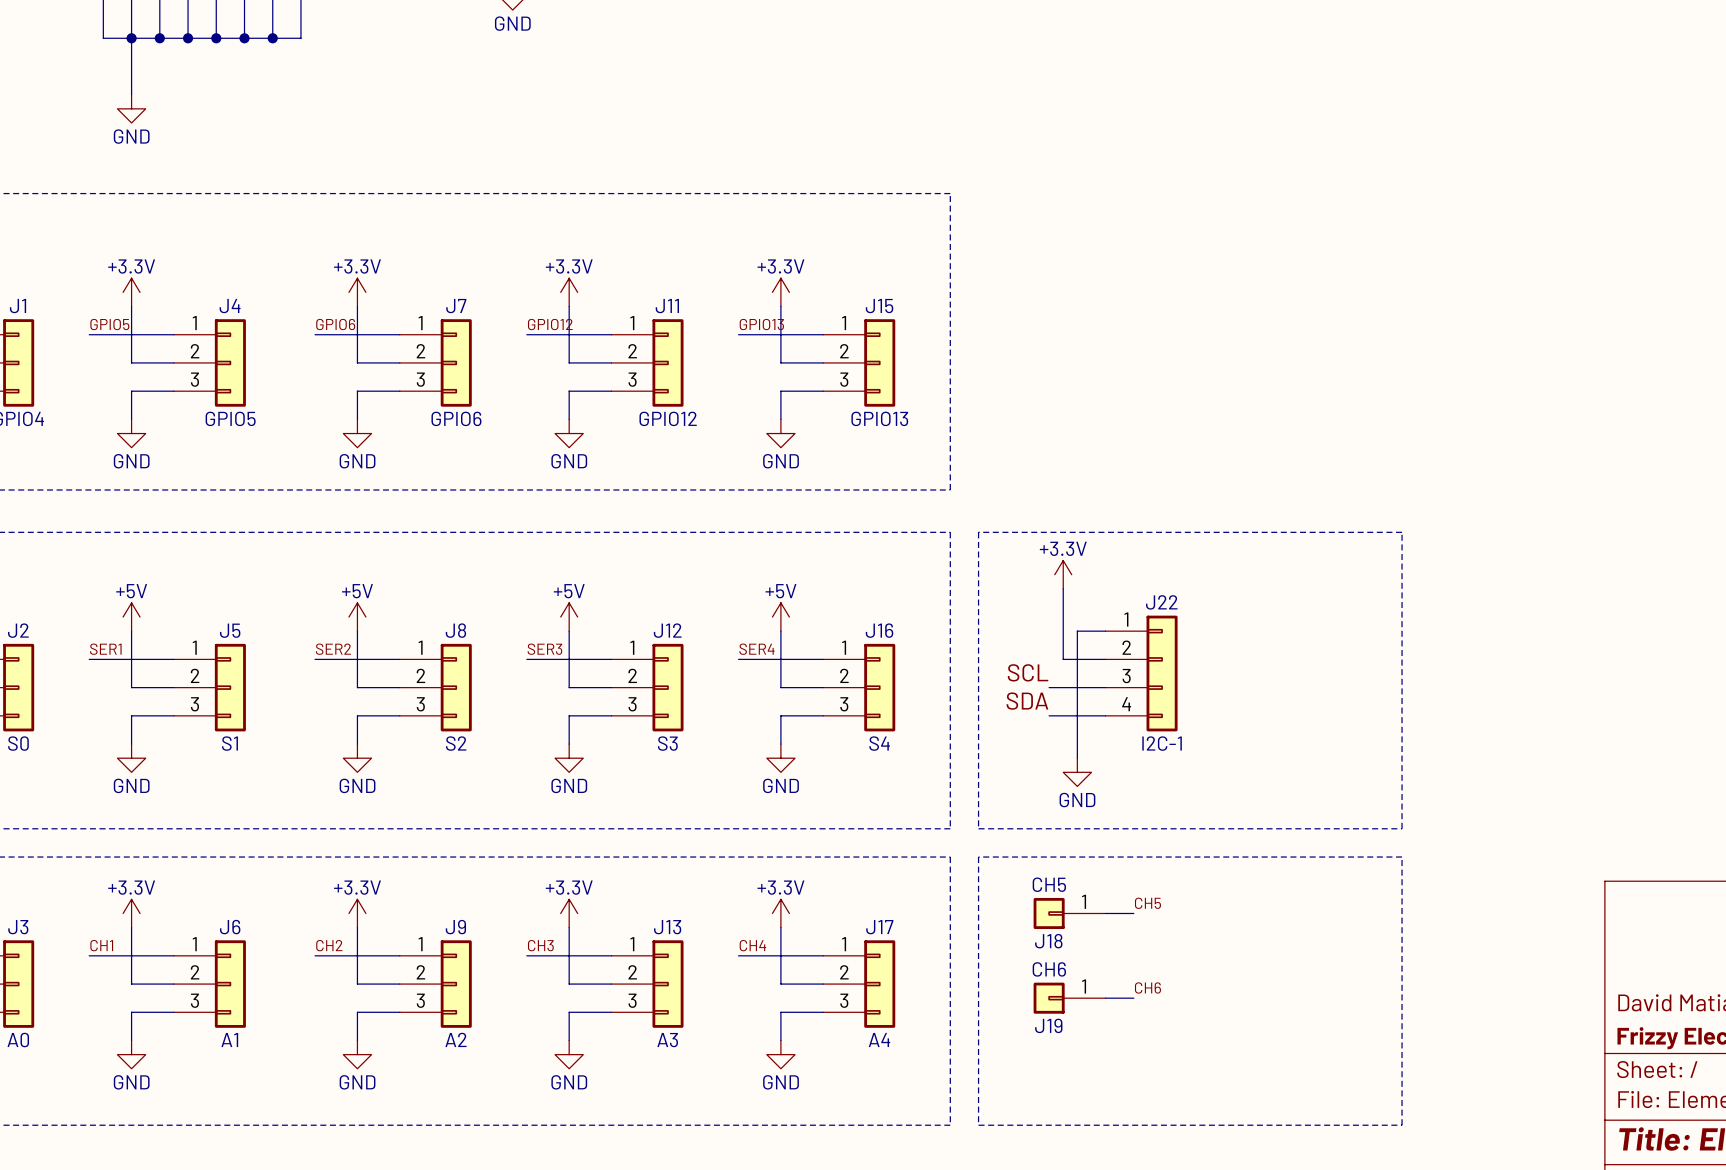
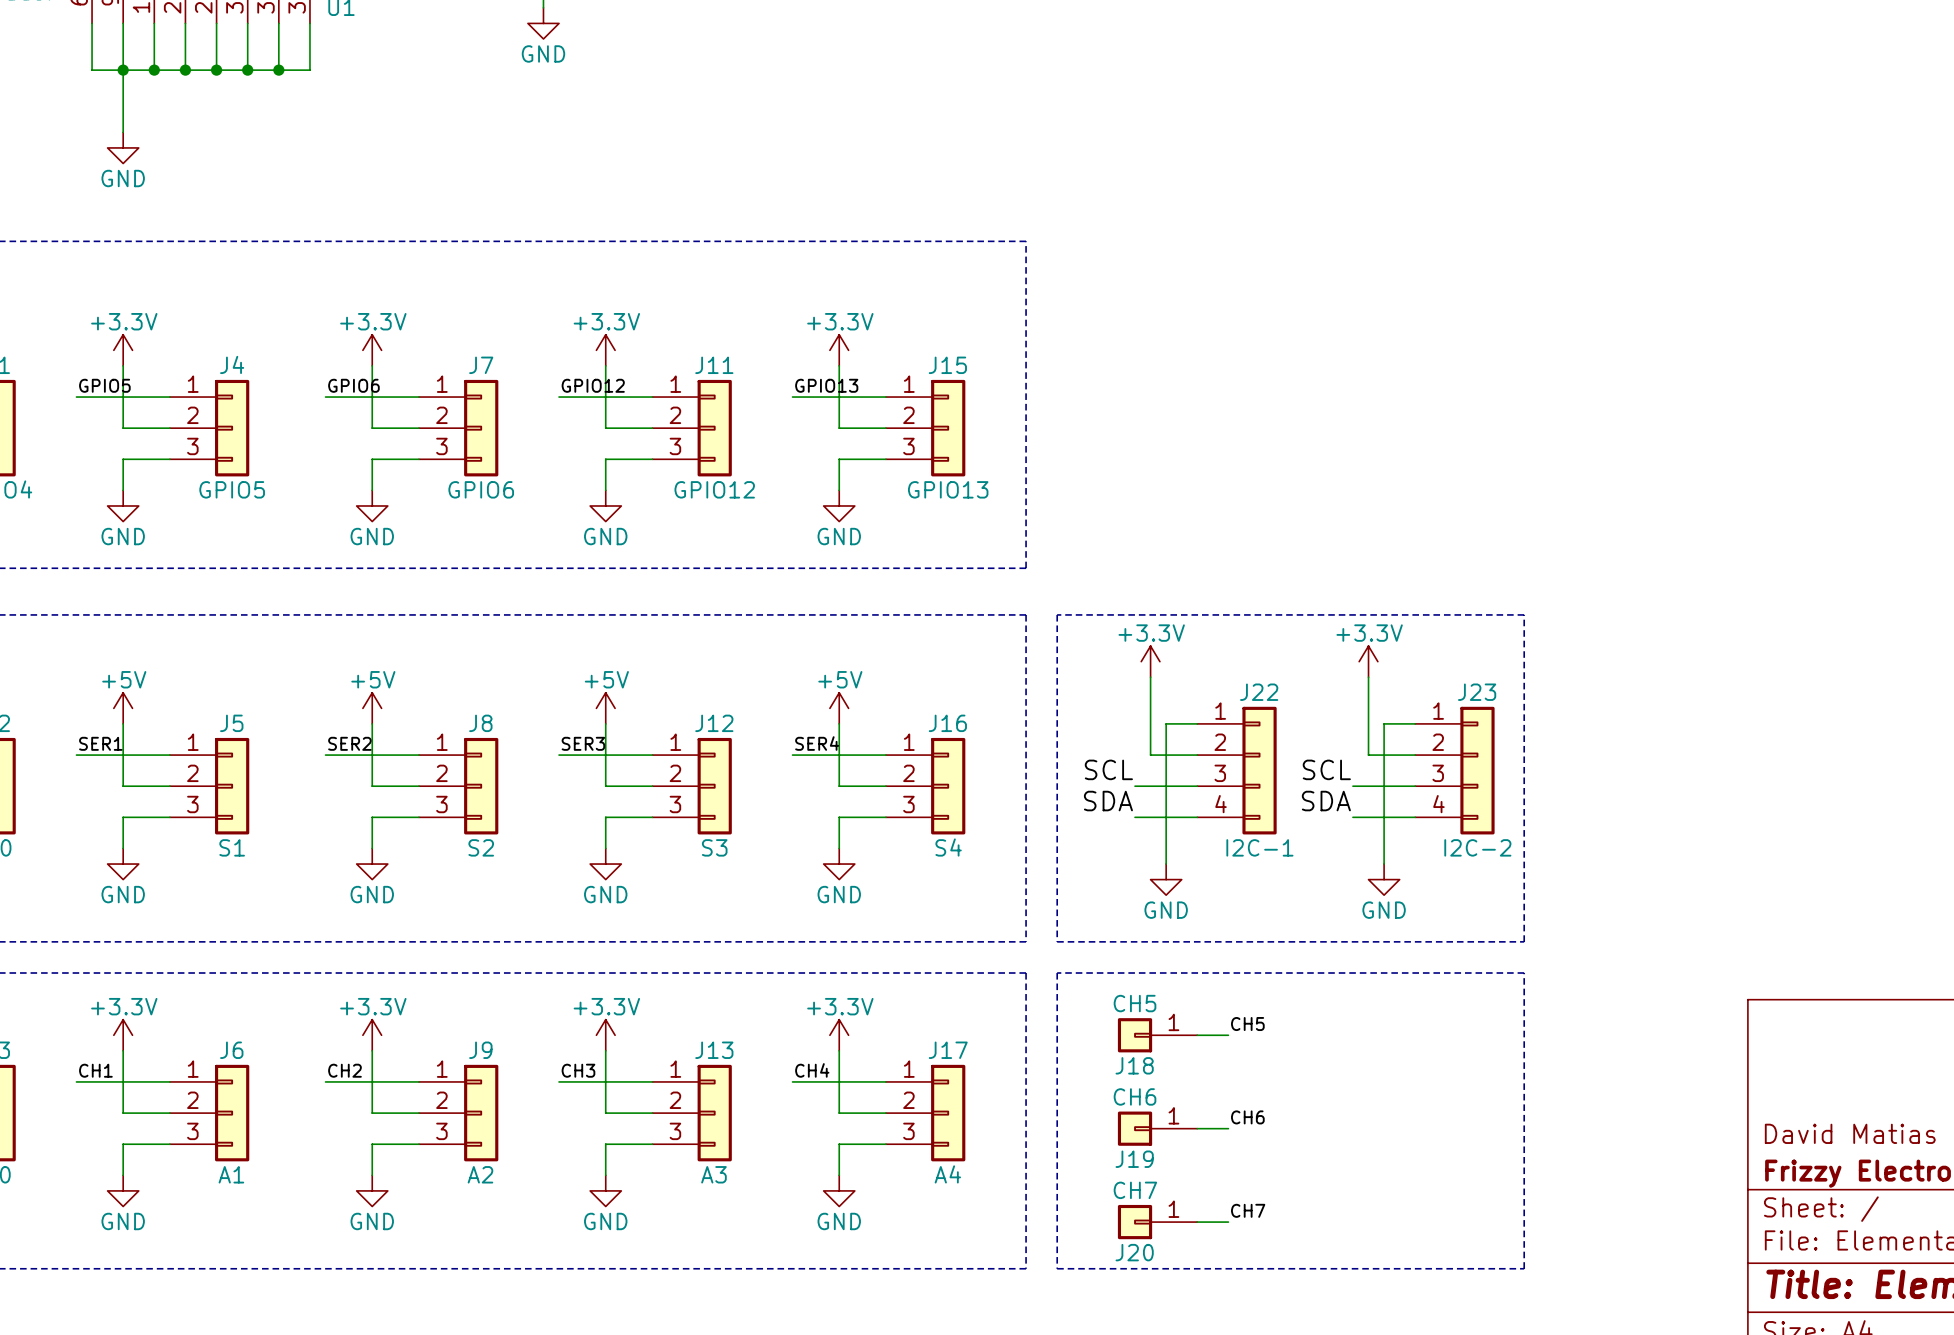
power symbol: none -> +3.3V (1368, 661)
wire: none -> (1368, 677) (1368, 755) (1415, 755)
wire: none -> (1415, 723) (1384, 723) (1384, 864)
label: none -> SCL (1326, 769)
J23: none -> I2C-2 (1454, 770)
wire: none -> (1352, 786) (1415, 786)
label: none -> SDA (1326, 801)
wire: none -> (1352, 817) (1415, 817)
power symbol: none -> GND (1384, 879)
label: none -> CH7 (1248, 1210)
J20: none -> CH7 (1157, 1222)
wire: none -> (1197, 1222) (1228, 1222)

